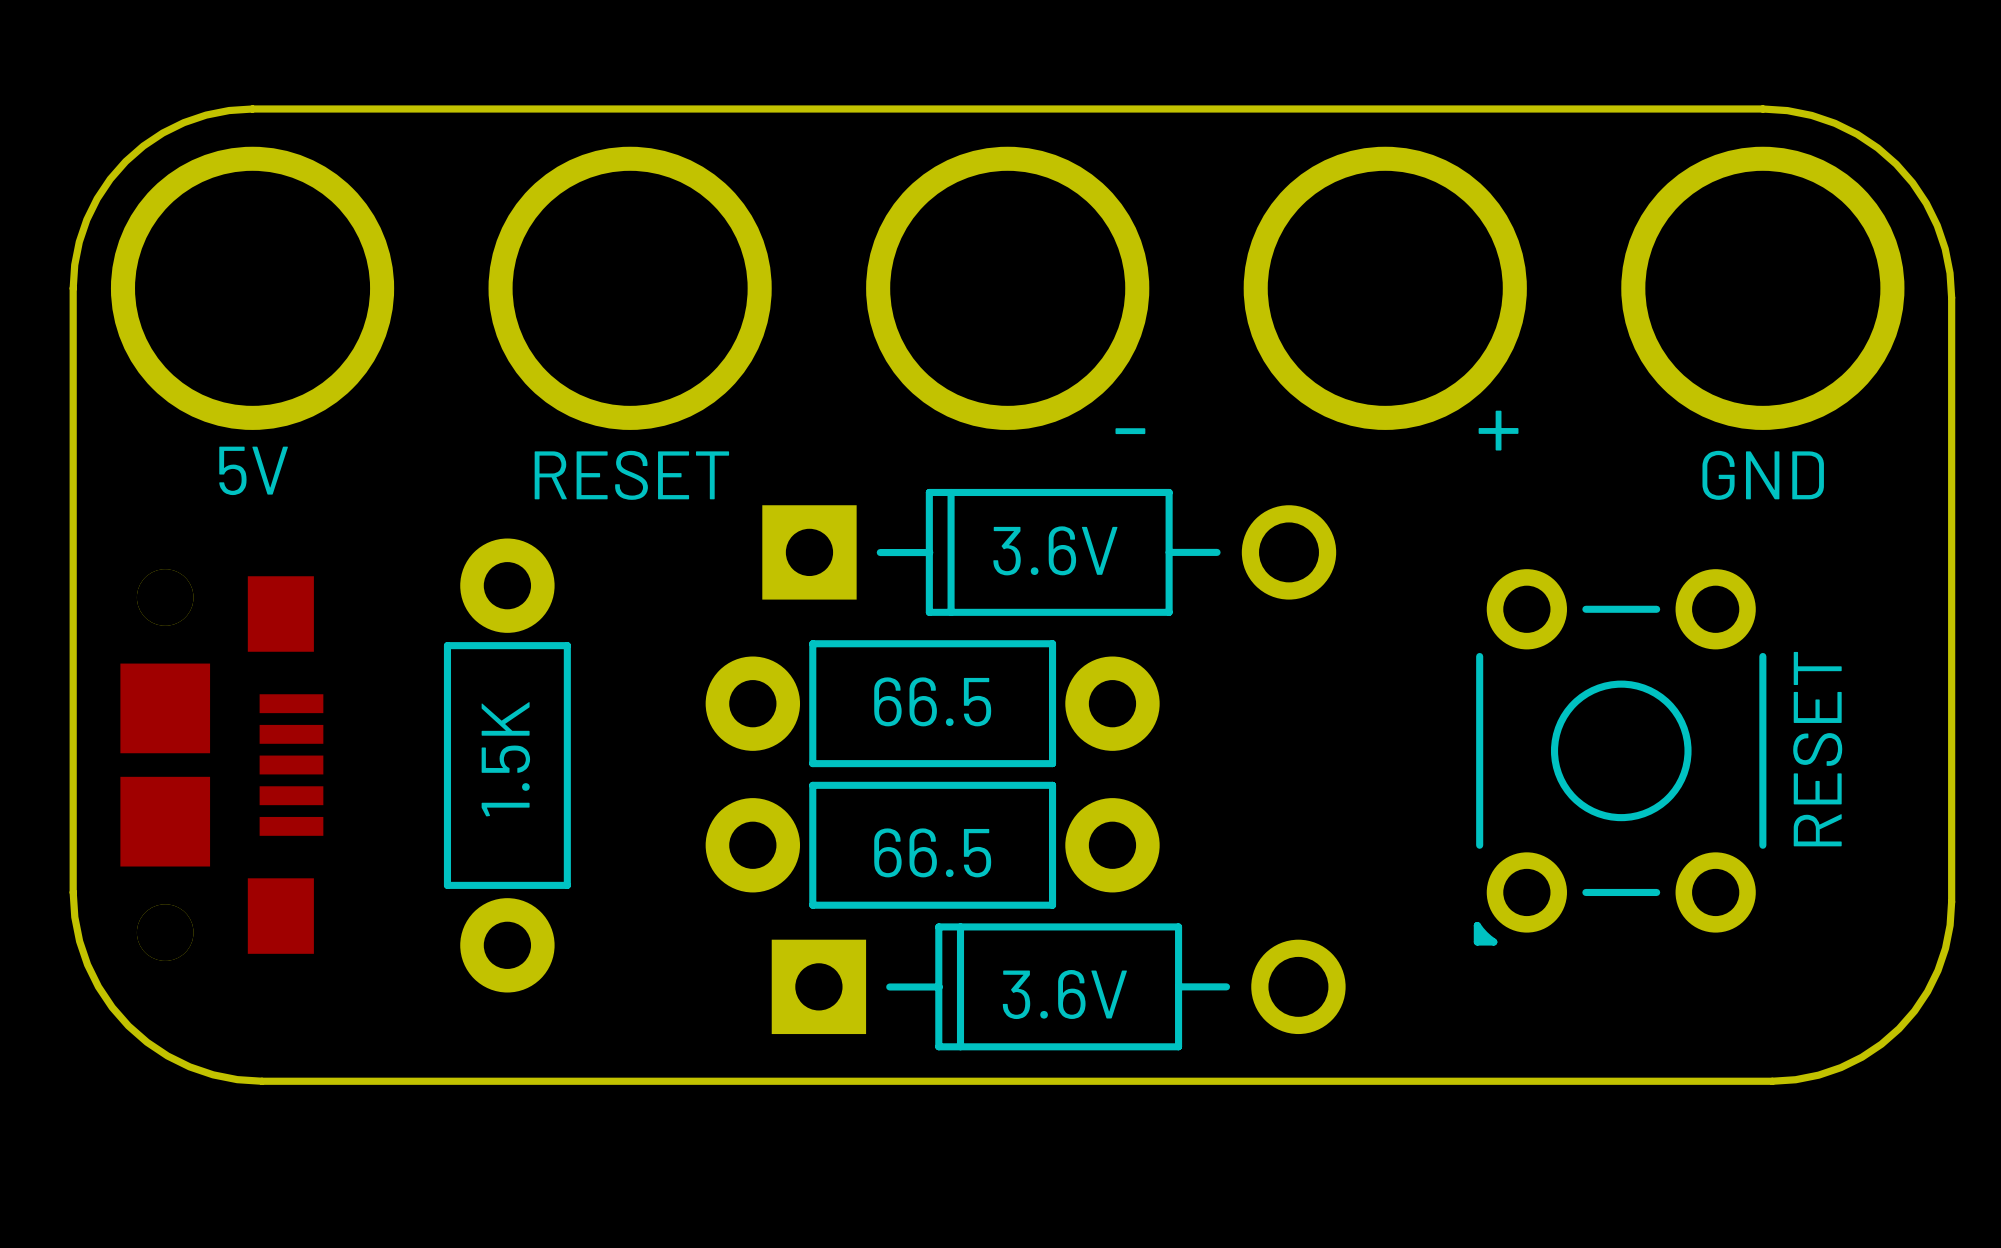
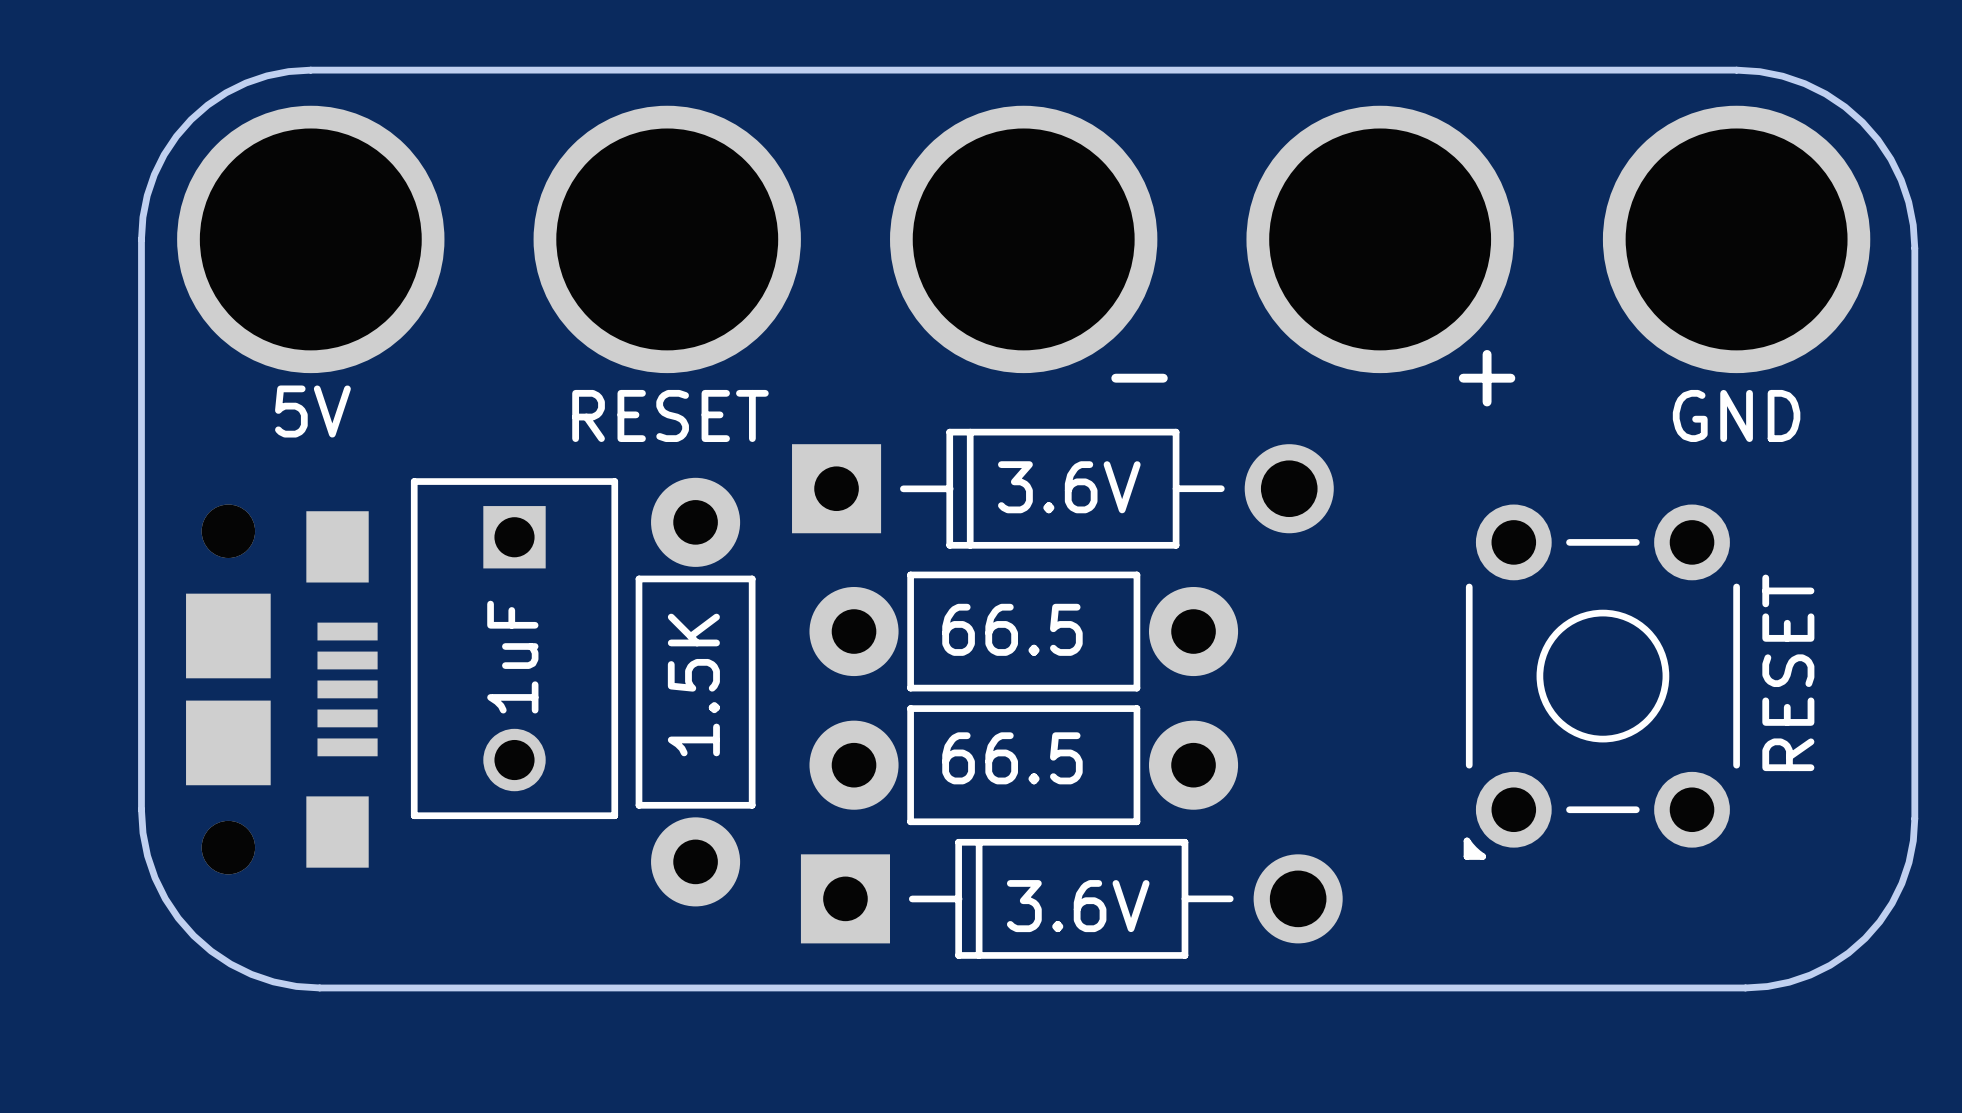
text position: 66.5 (932, 701) -> 66.5 (1012, 629)
part position: (932, 703) -> (1023, 631)
part: none -> (514, 648)
text position: 1.5K (505, 759) -> 1.5K (693, 684)
part: (507, 765) -> none
part: none -> (695, 692)
part position: (932, 845) -> (1023, 765)
text position: 66.5 (932, 852) -> 66.5 (1012, 758)

